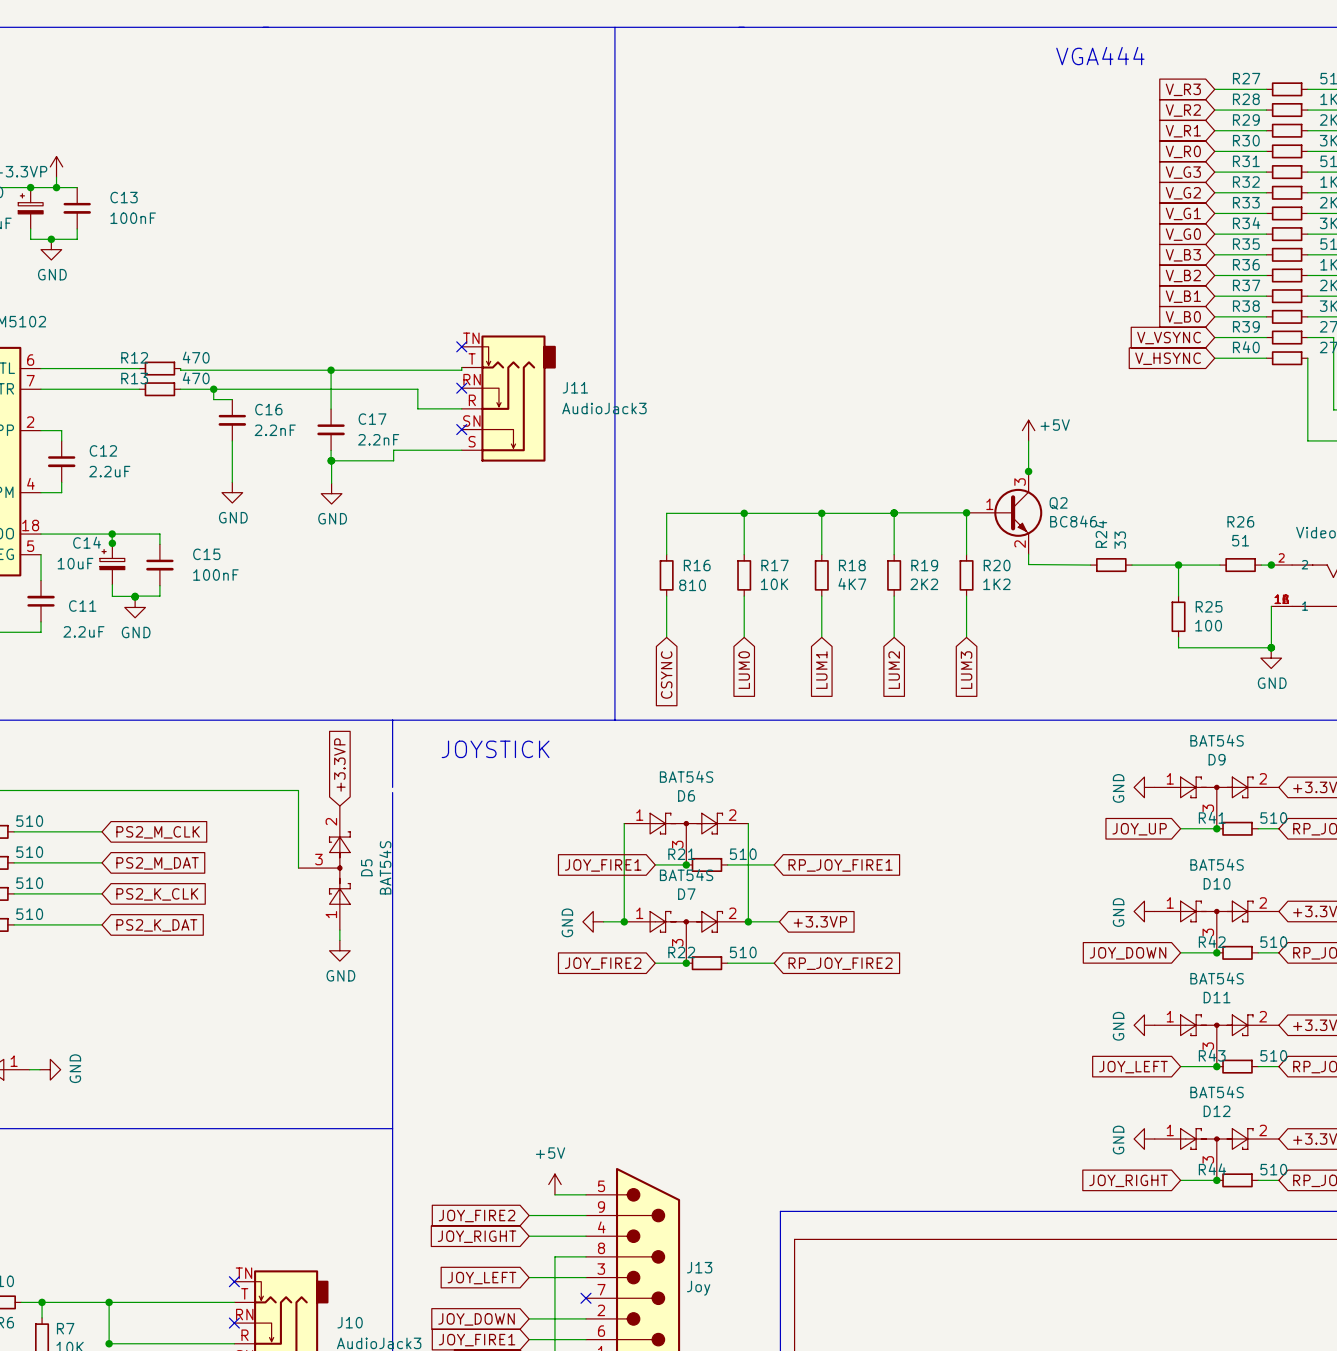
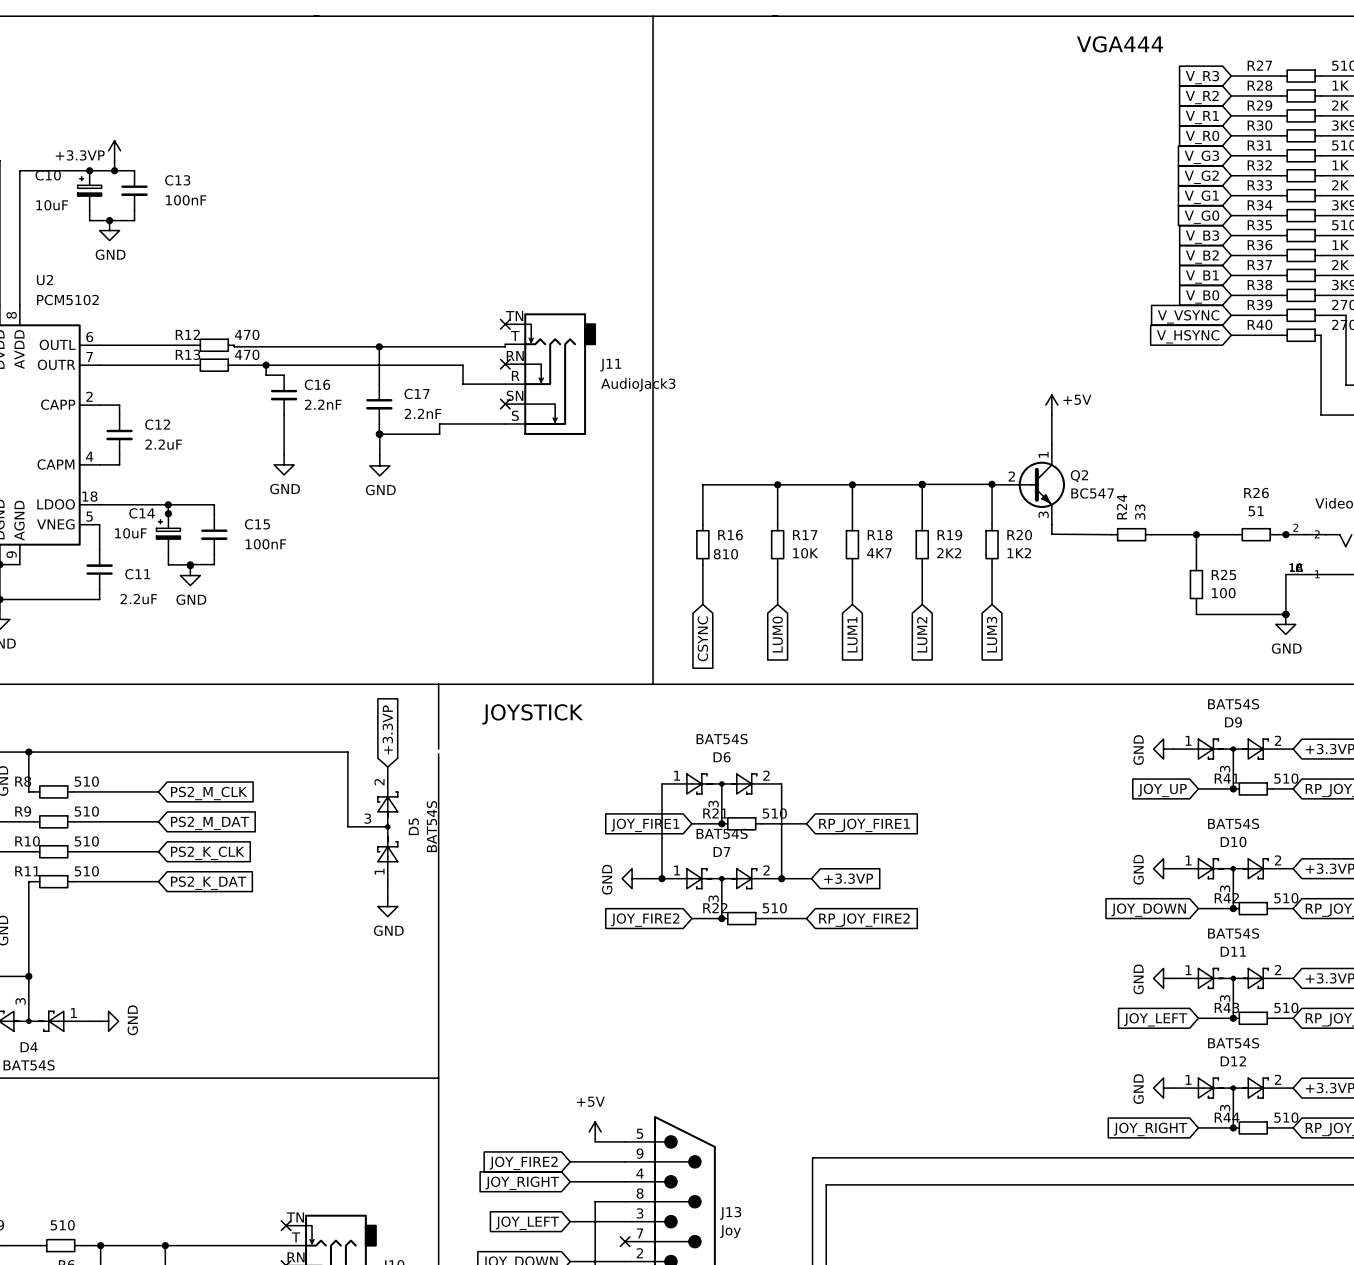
Q2 symbol: [966, 471, 1043, 555] -> [992, 444, 1066, 525]
junction: (1028, 471) -> none
Q2 value: BC846 (1073, 521) -> BC547 (1092, 493)

